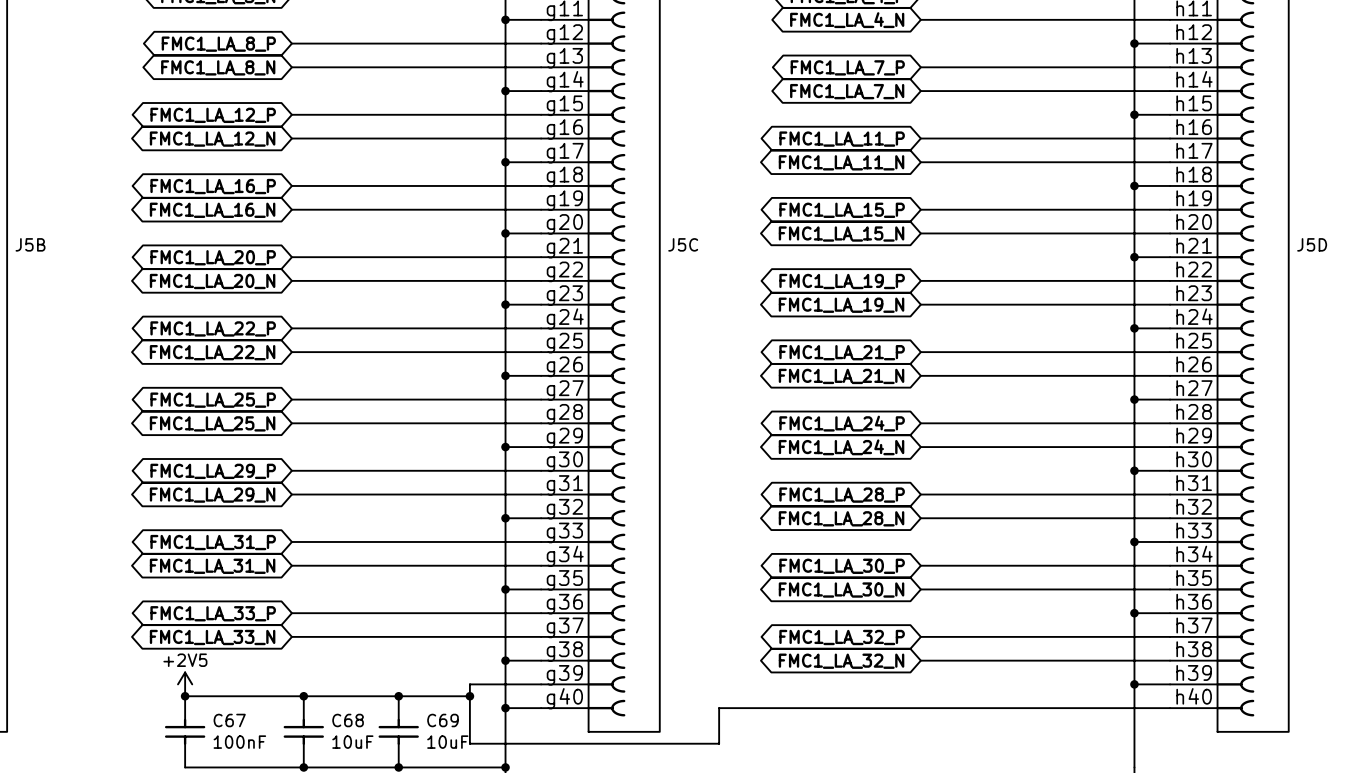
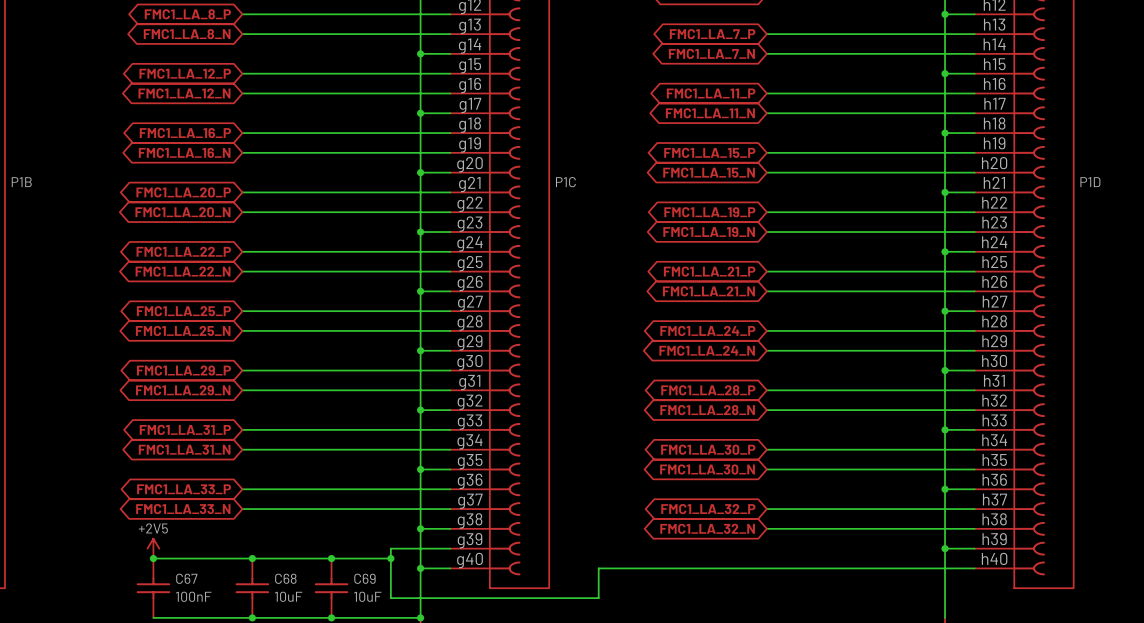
J5B name: J5B (30, 244) -> P1B (21, 182)
J5C name: J5C (683, 244) -> P1C (565, 182)
J5D name: J5D (1312, 244) -> P1D (1090, 182)

